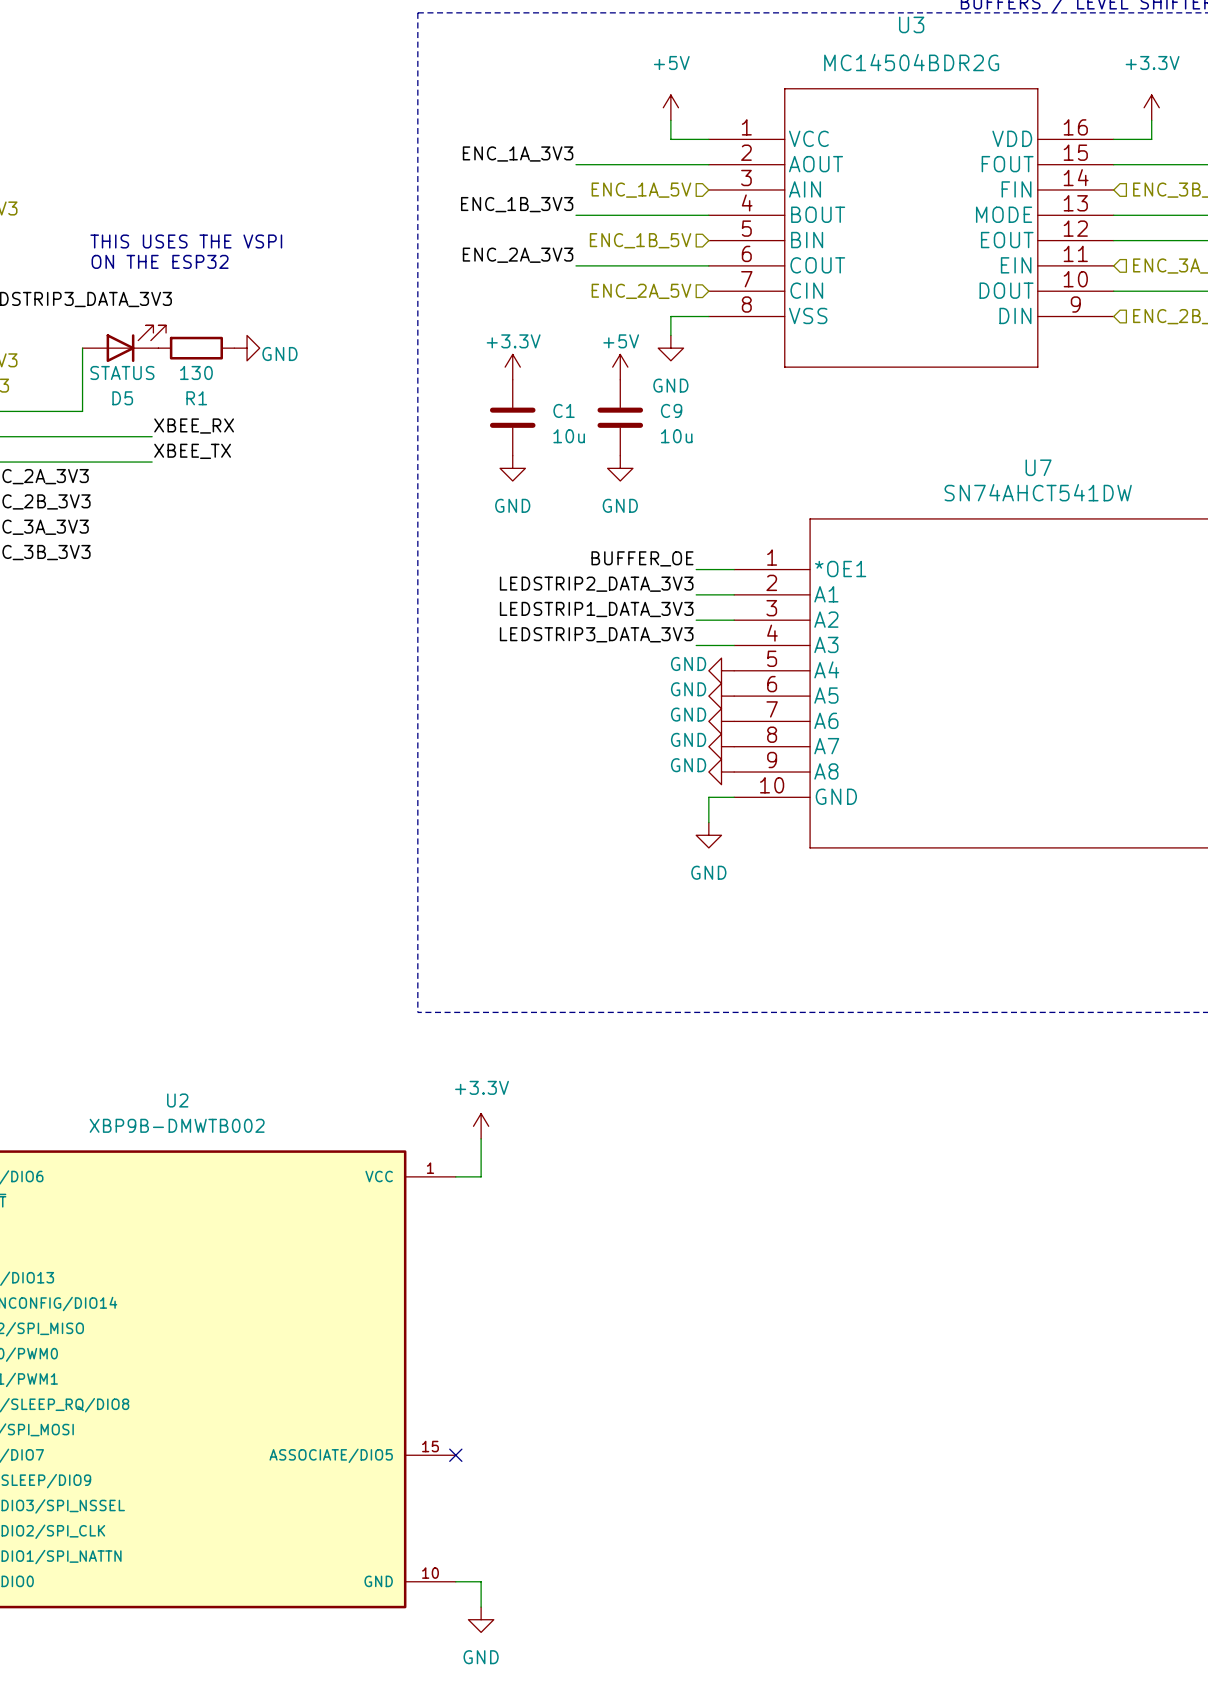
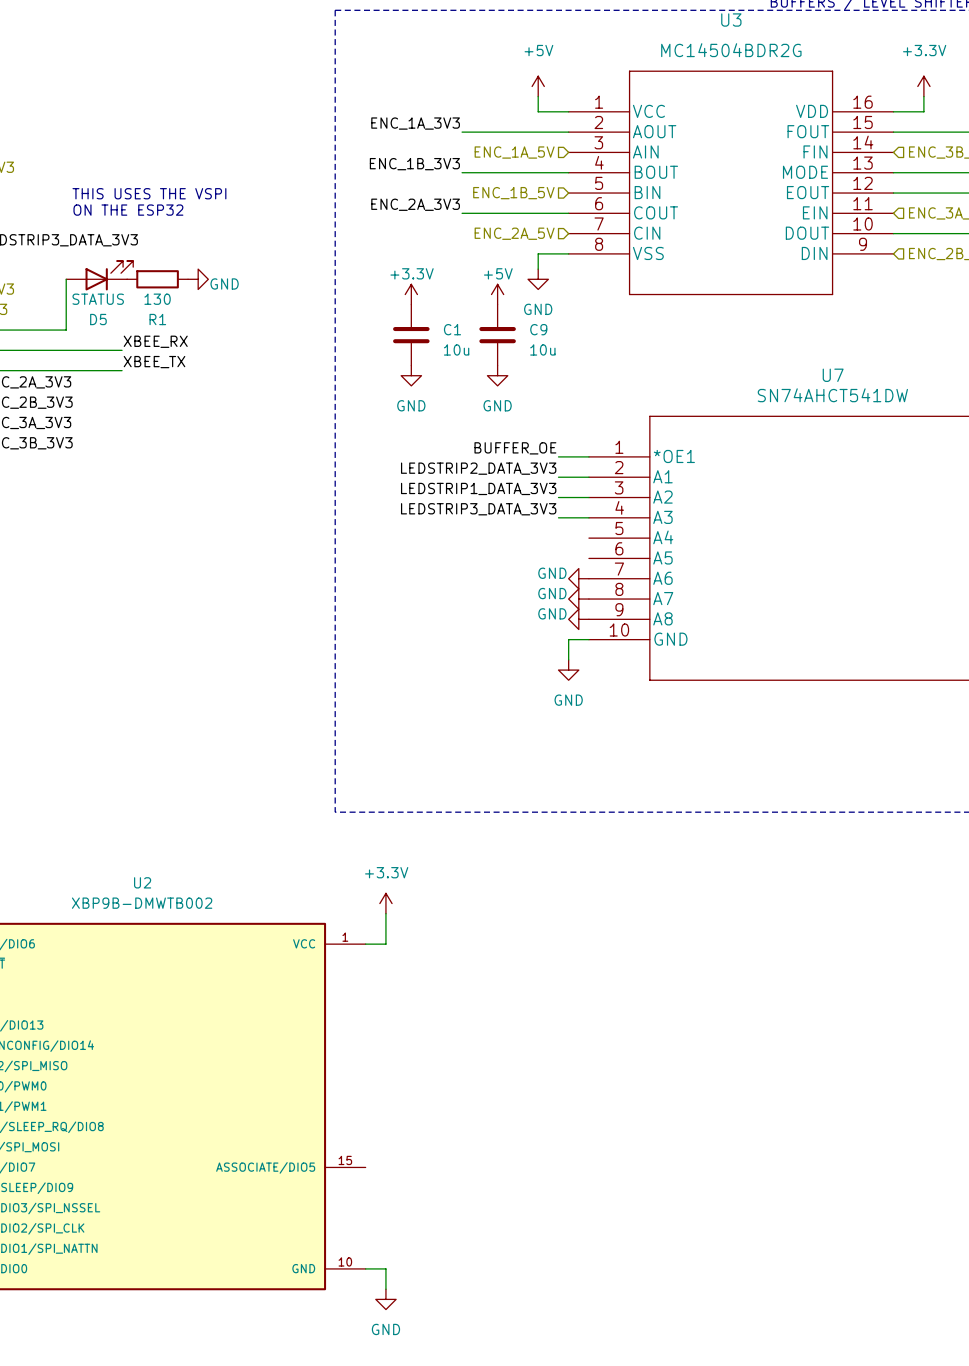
power symbol: GND (721, 670) -> none
power symbol: GND (721, 696) -> none
no-connect mark: (455, 1455) -> none

